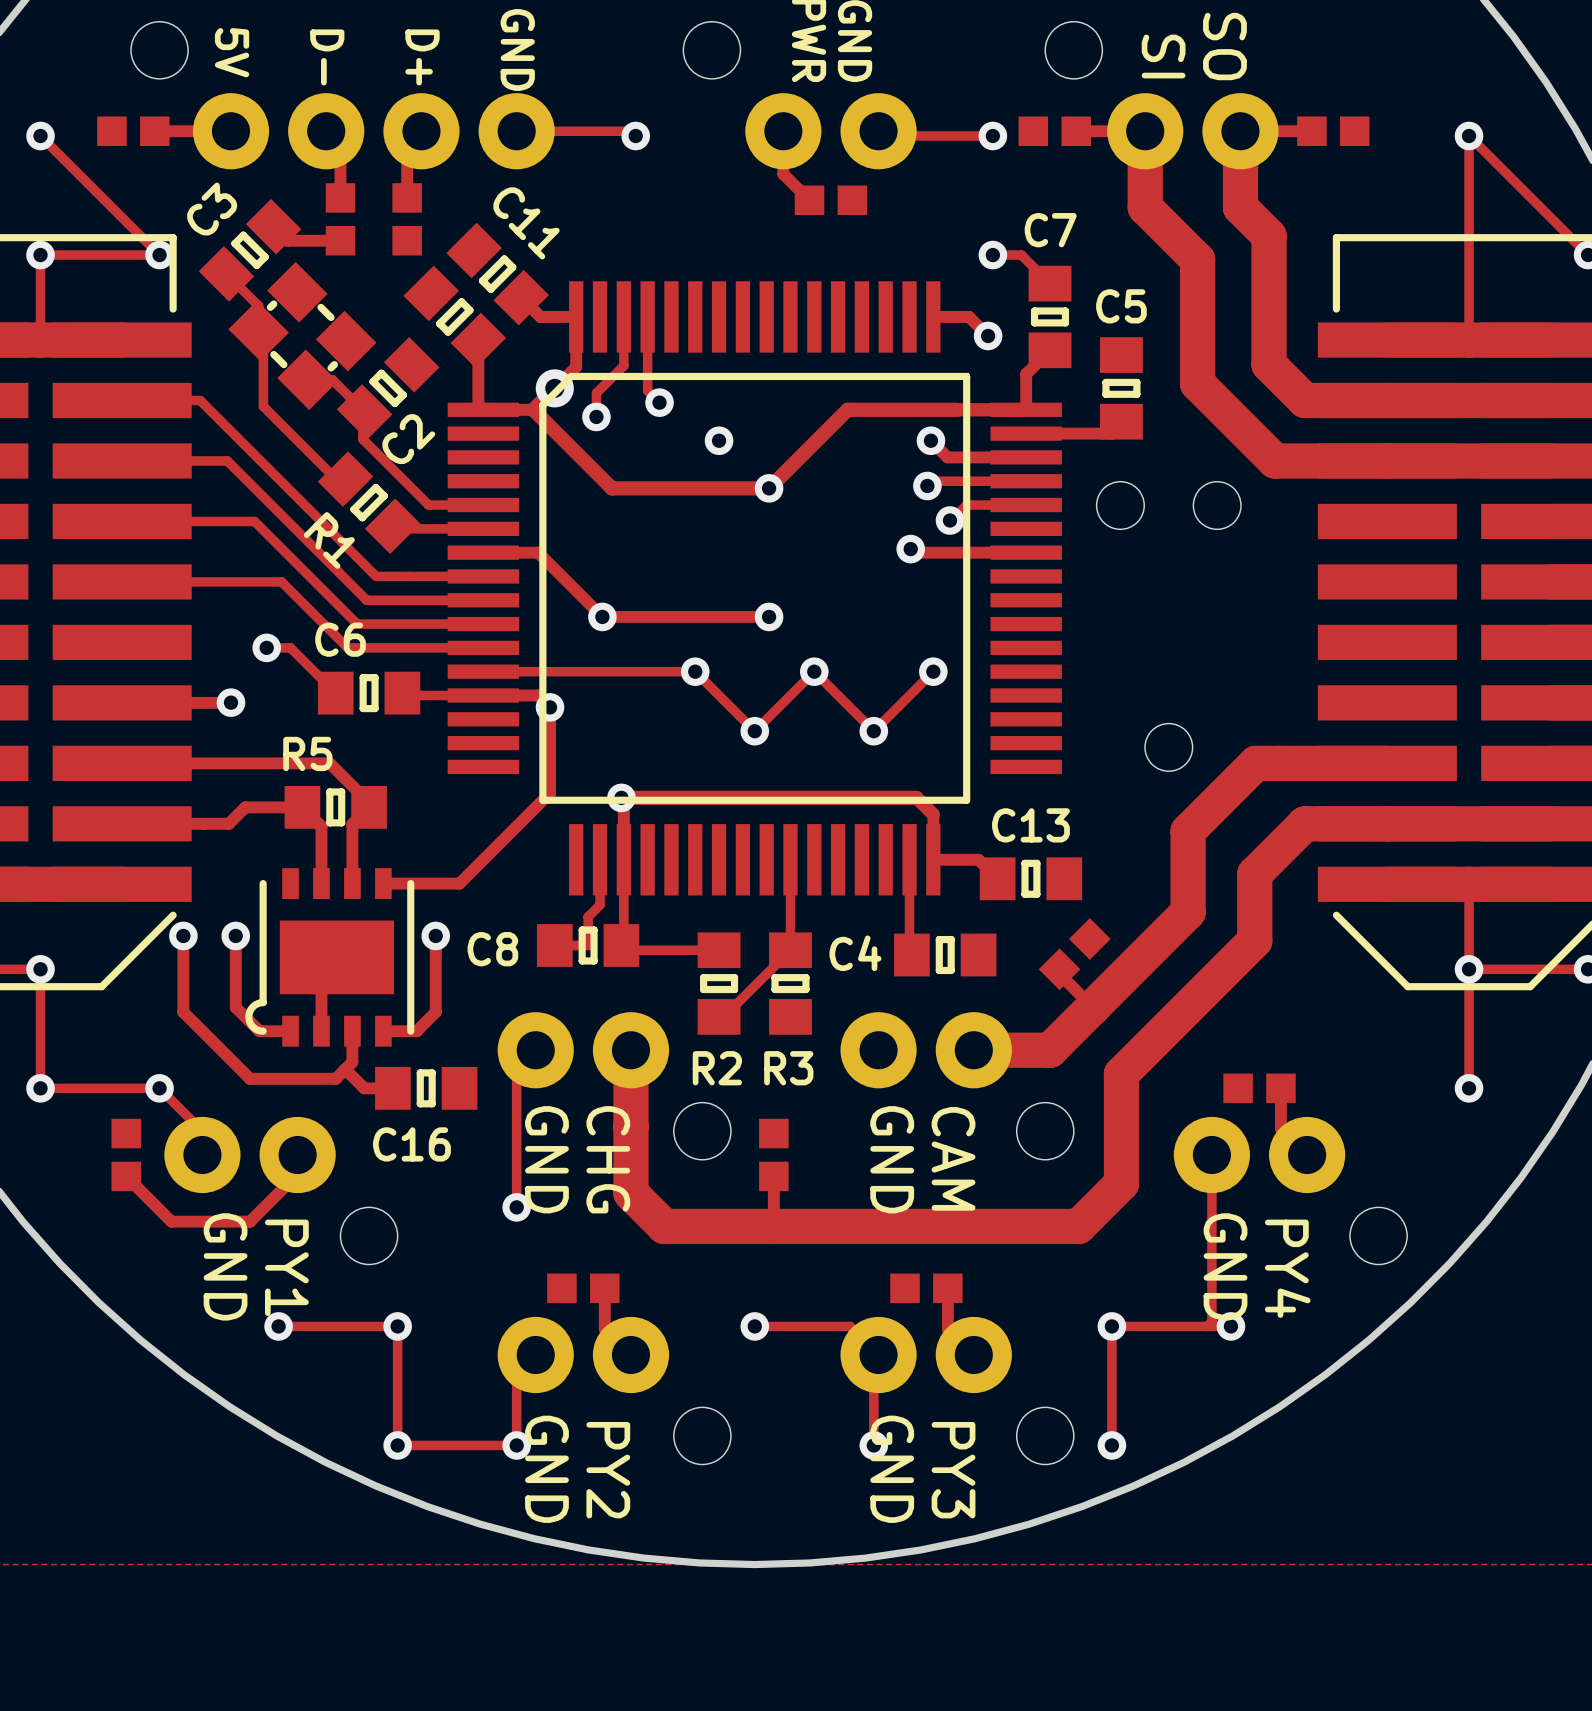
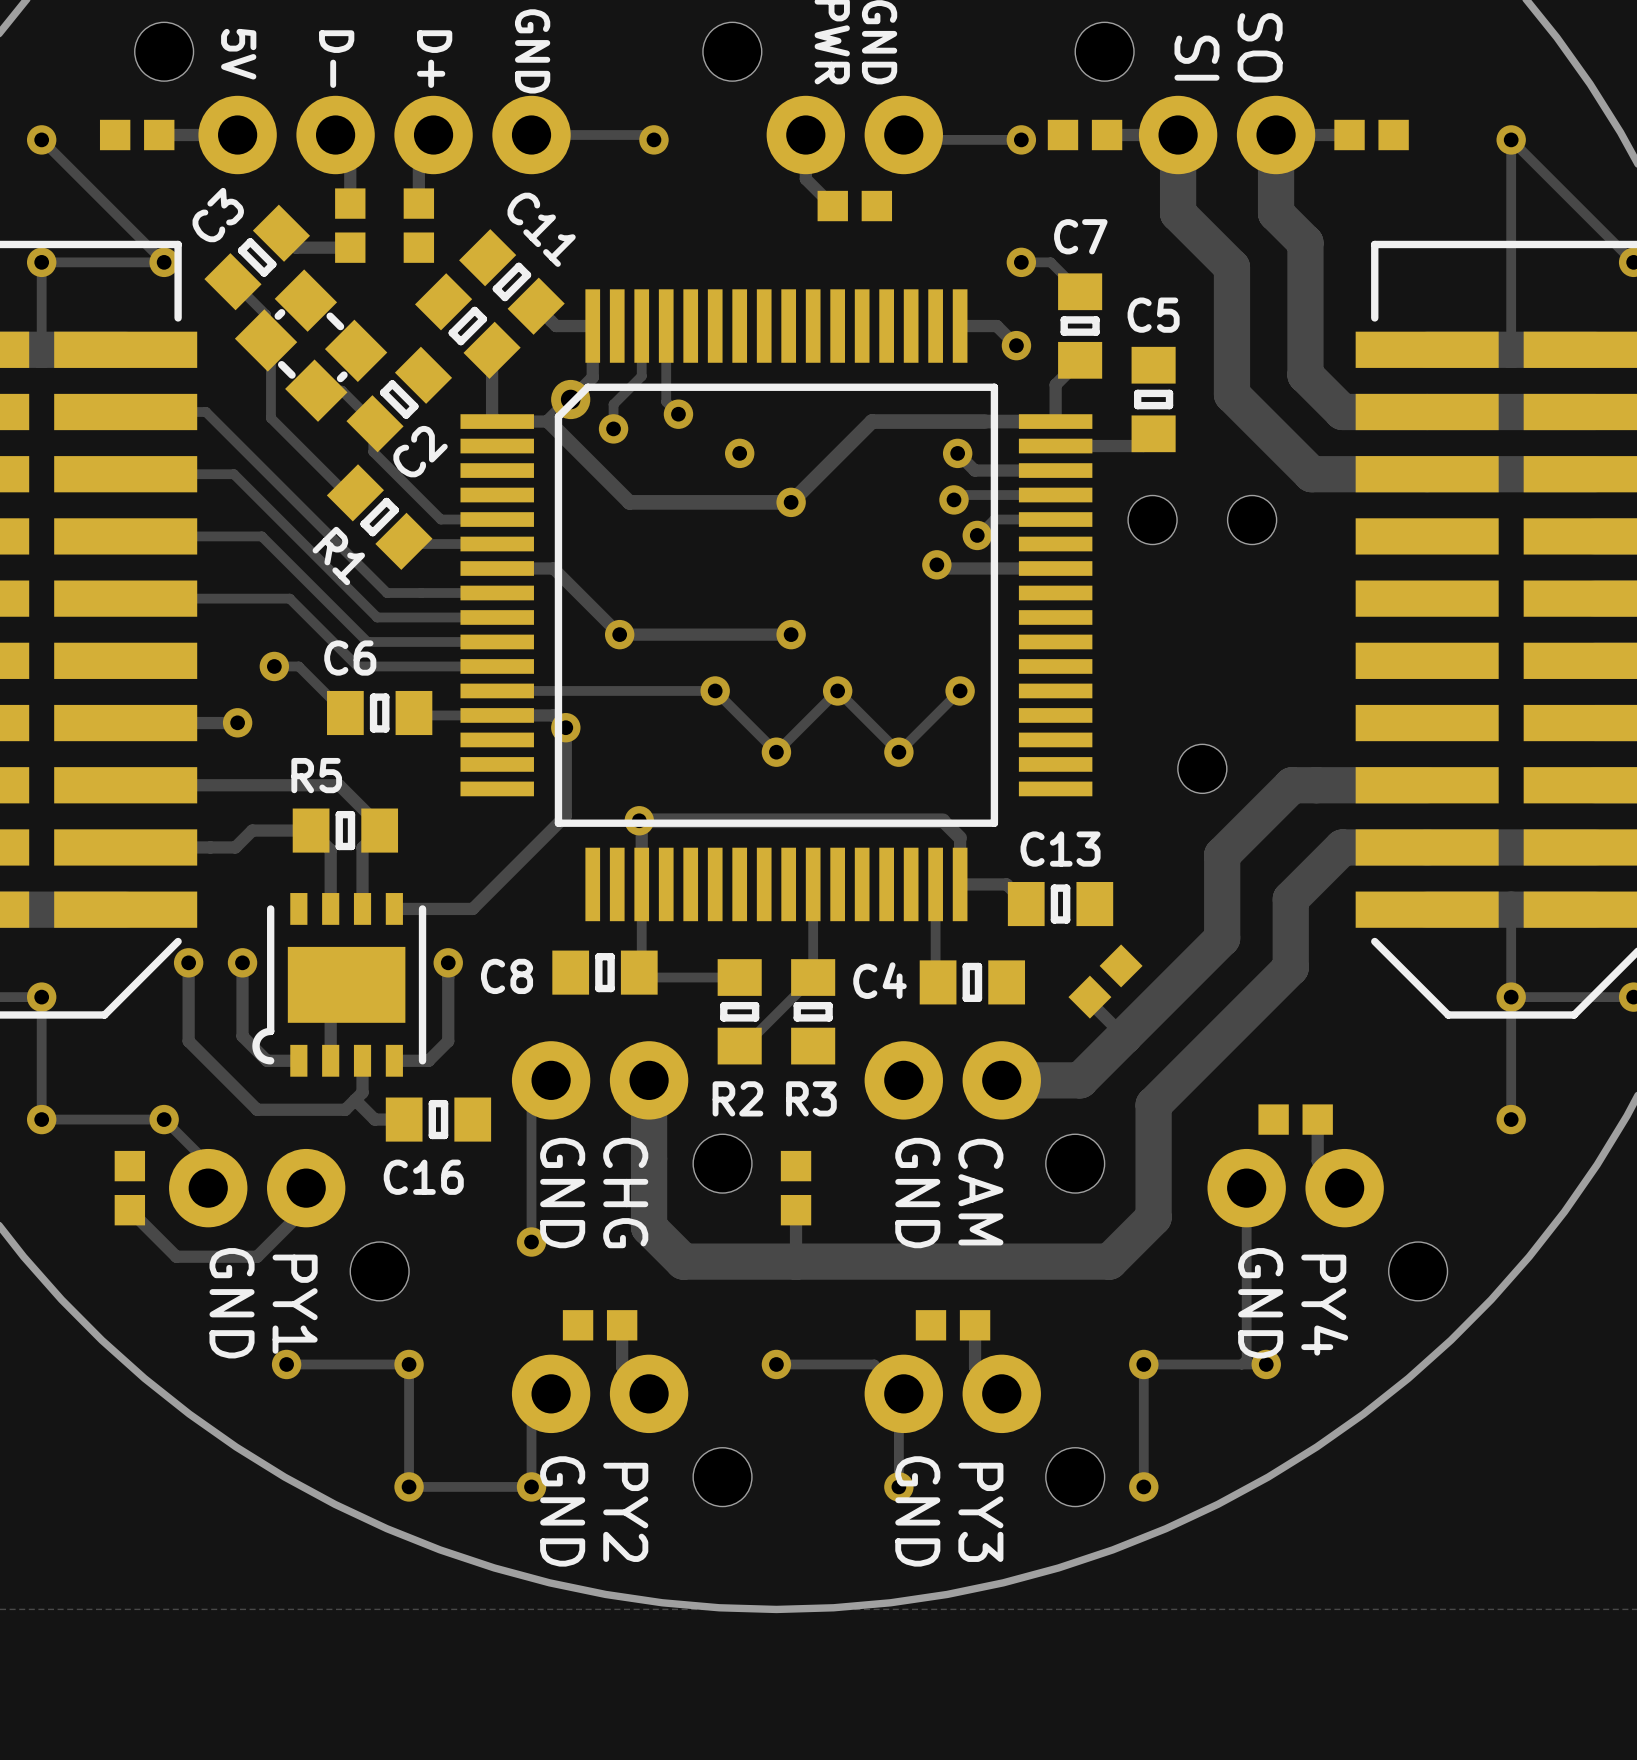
track: (600, 859) (600, 905) (588, 916) (588, 945) (554, 945) -> none

